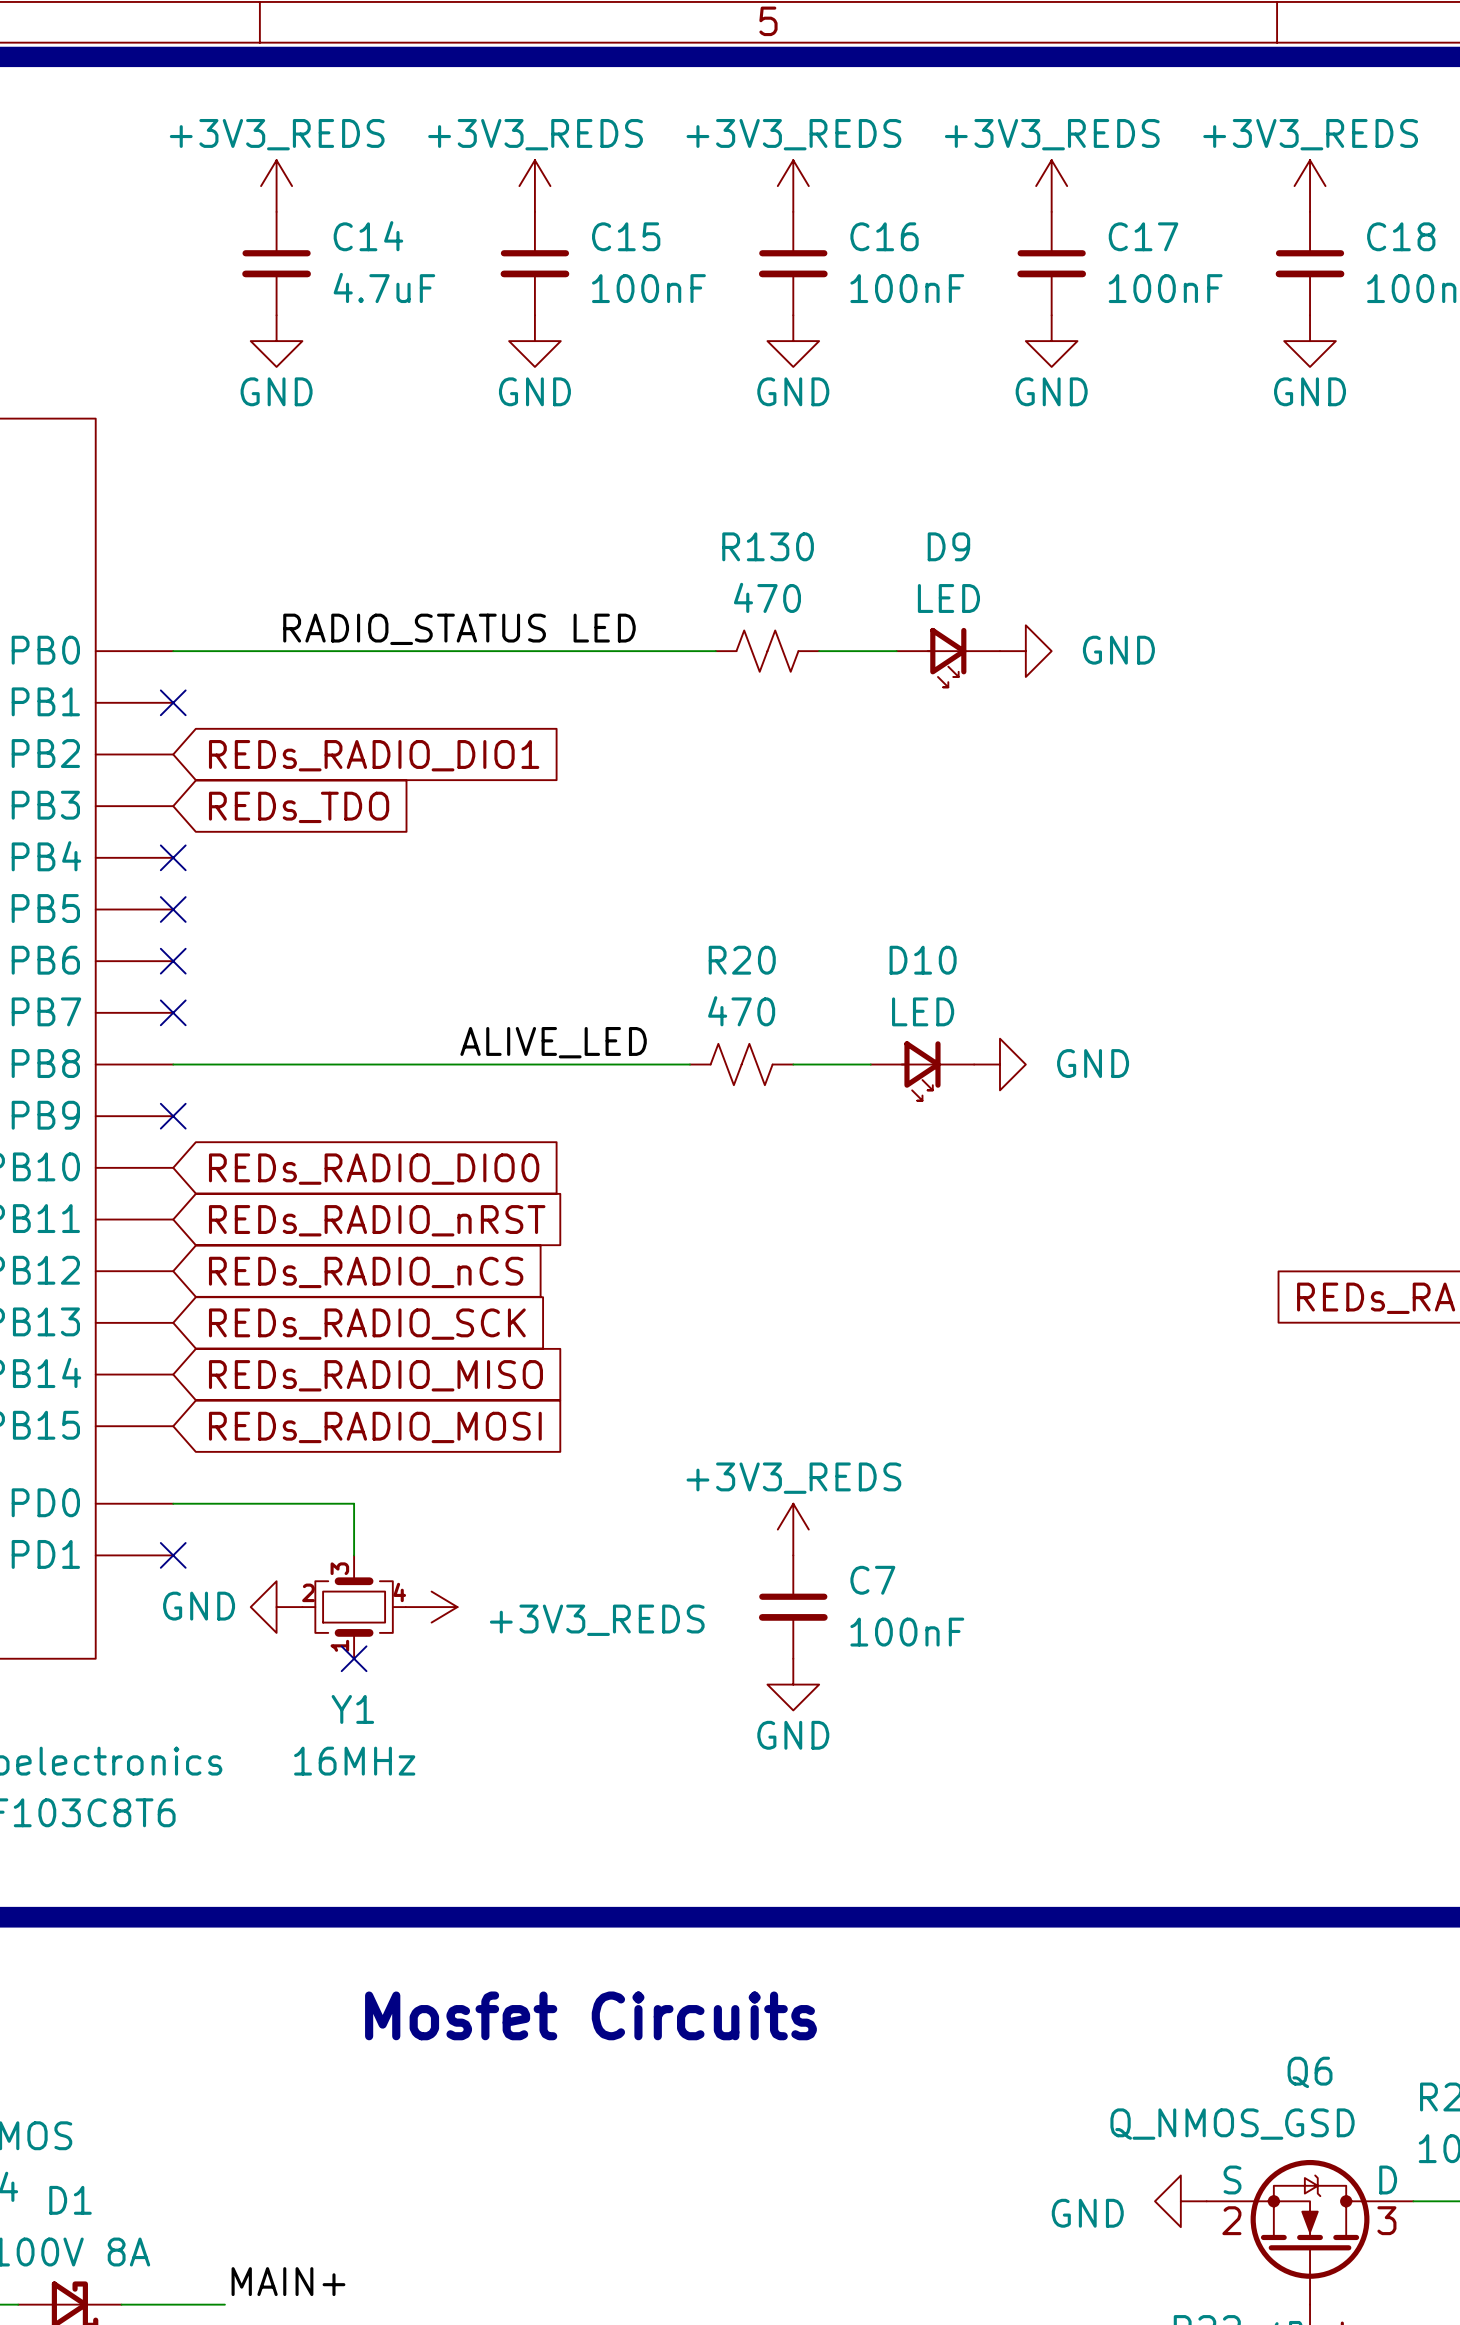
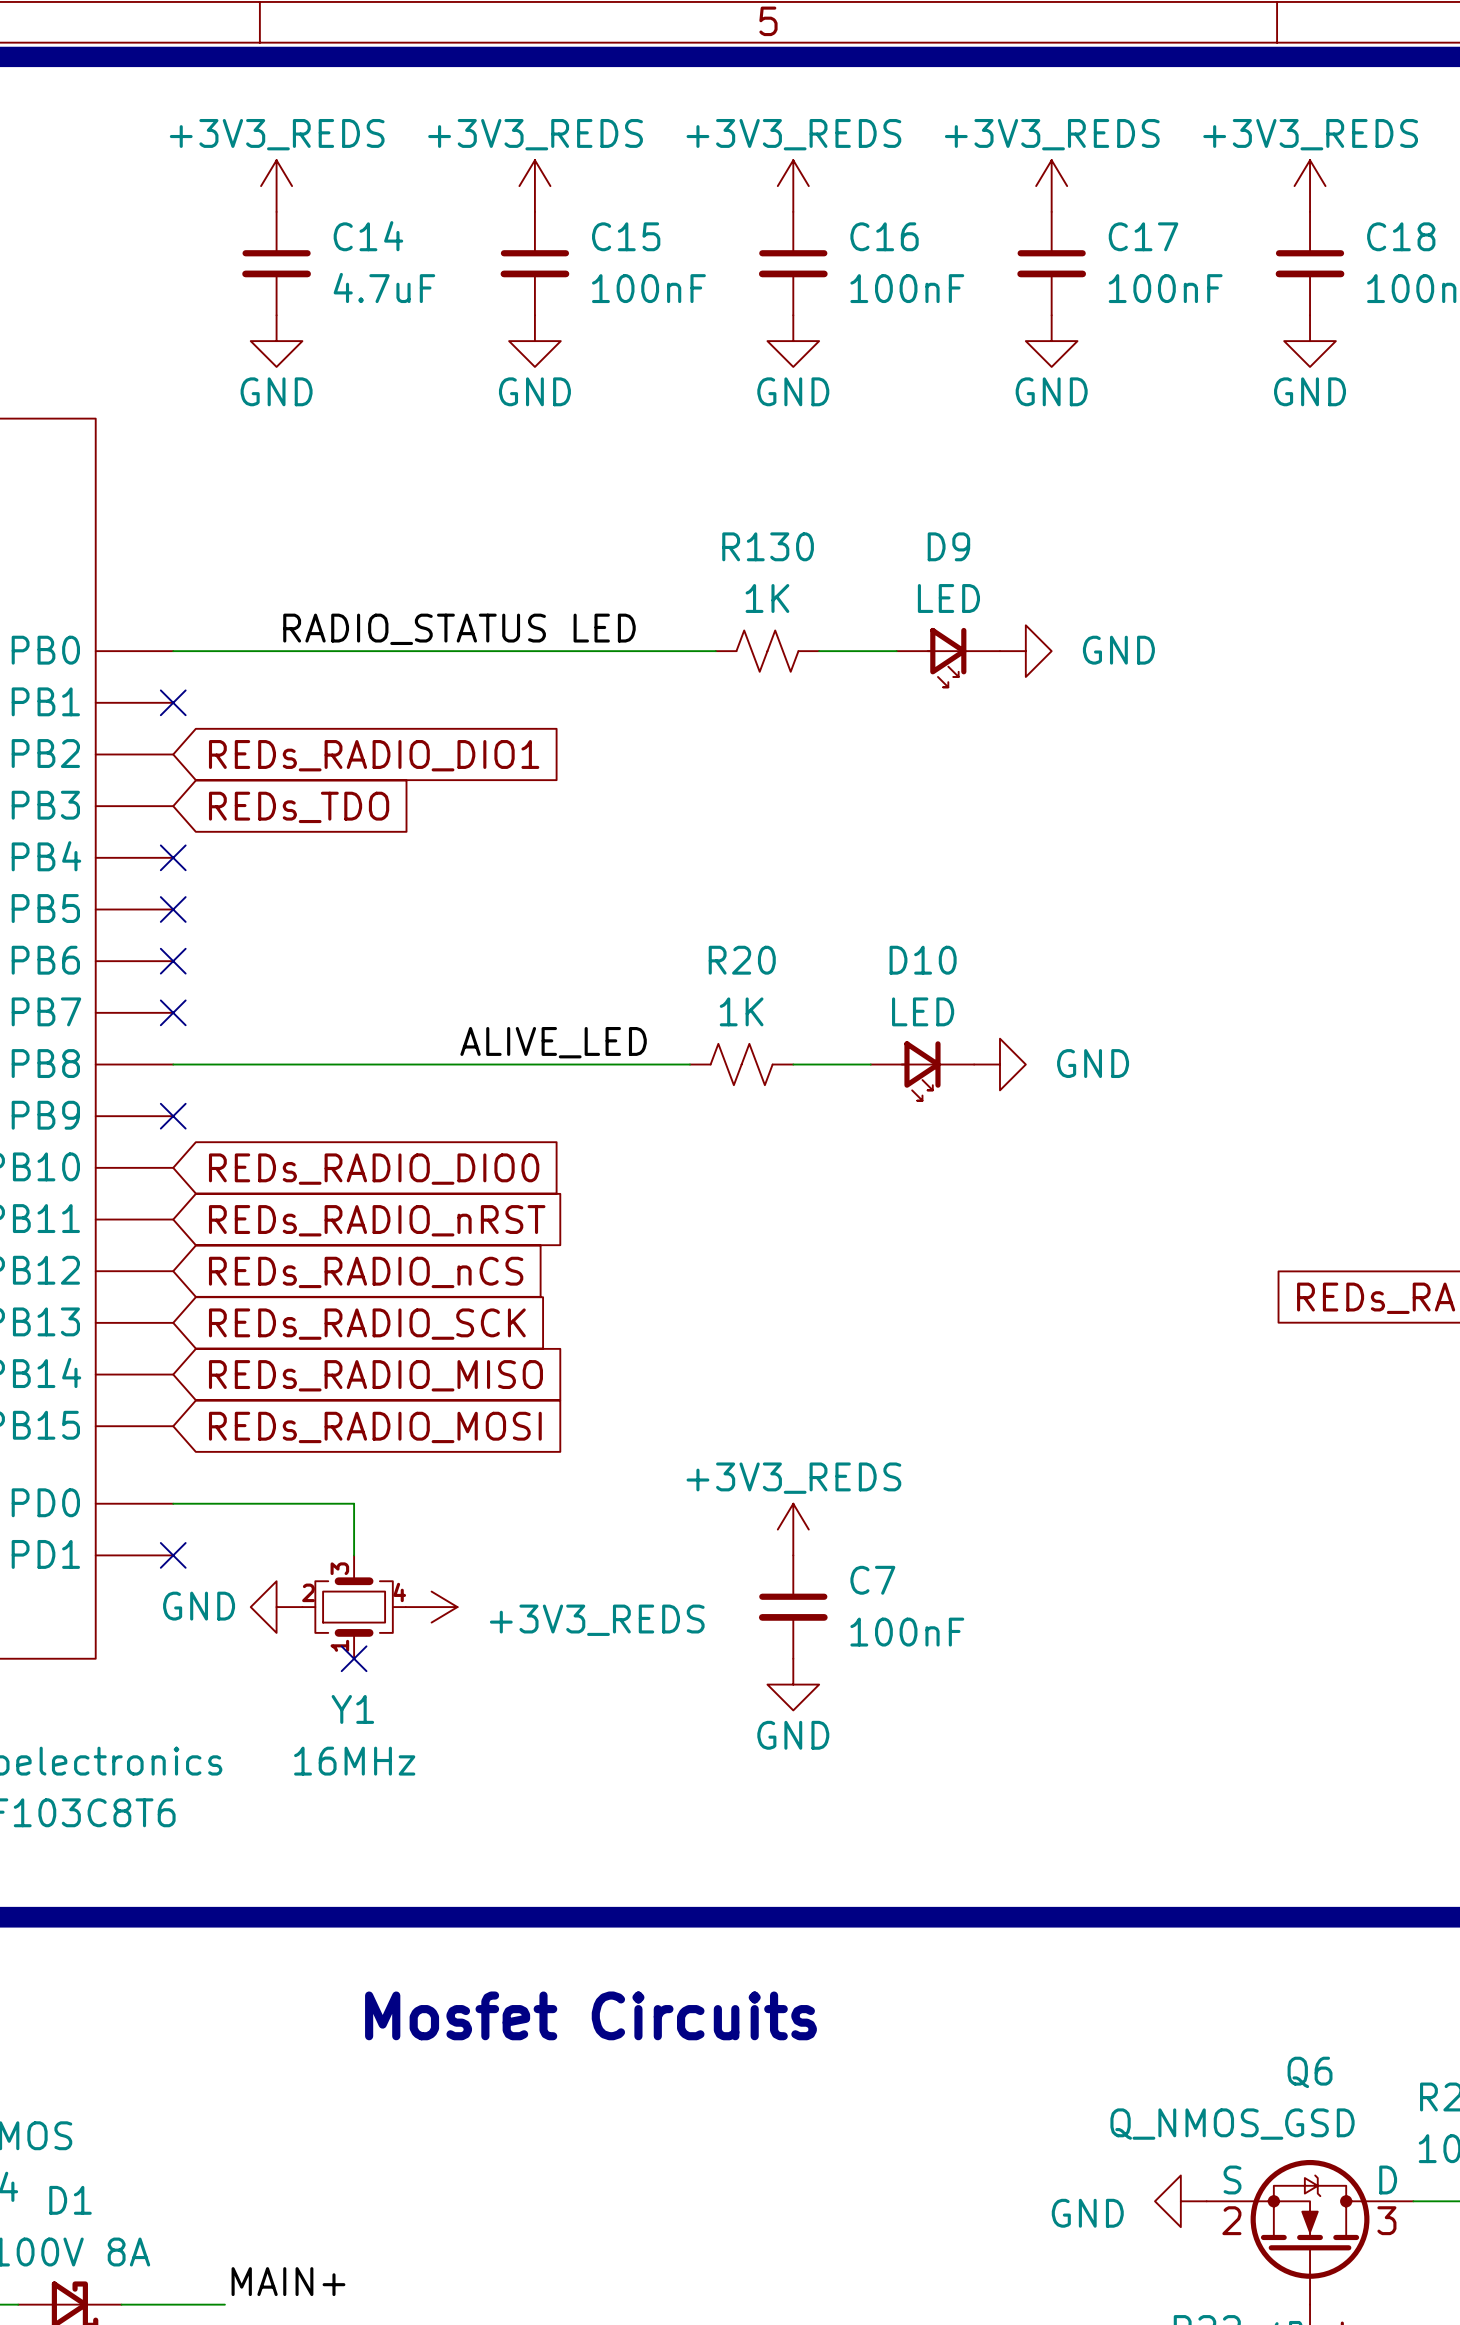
R130 value: 470 (767, 597) -> 1K (767, 598)
R20 value: 470 (741, 1011) -> 1K (741, 1011)

